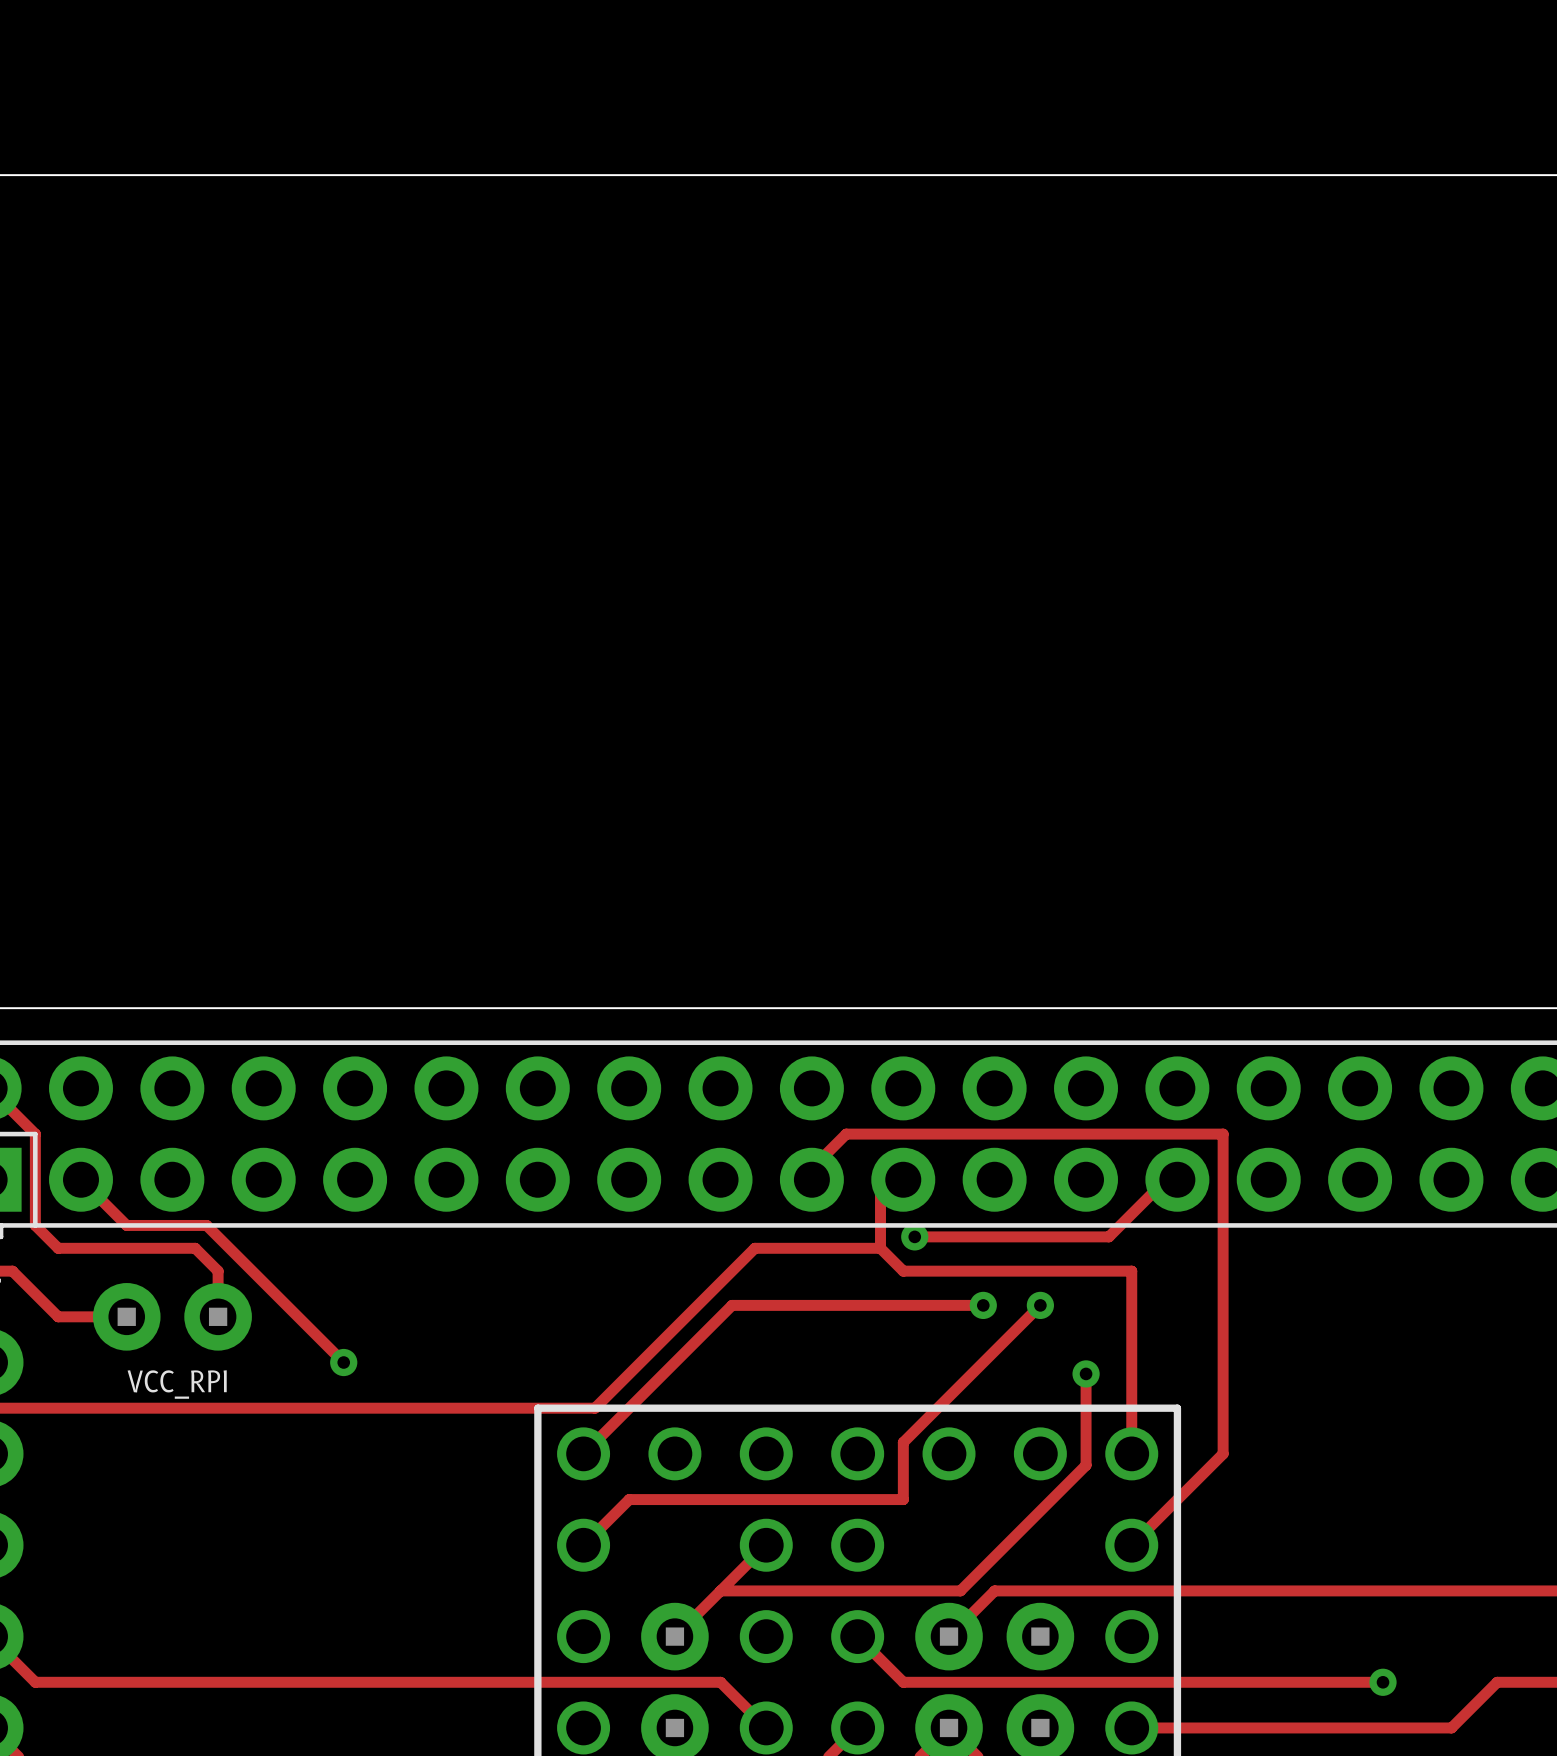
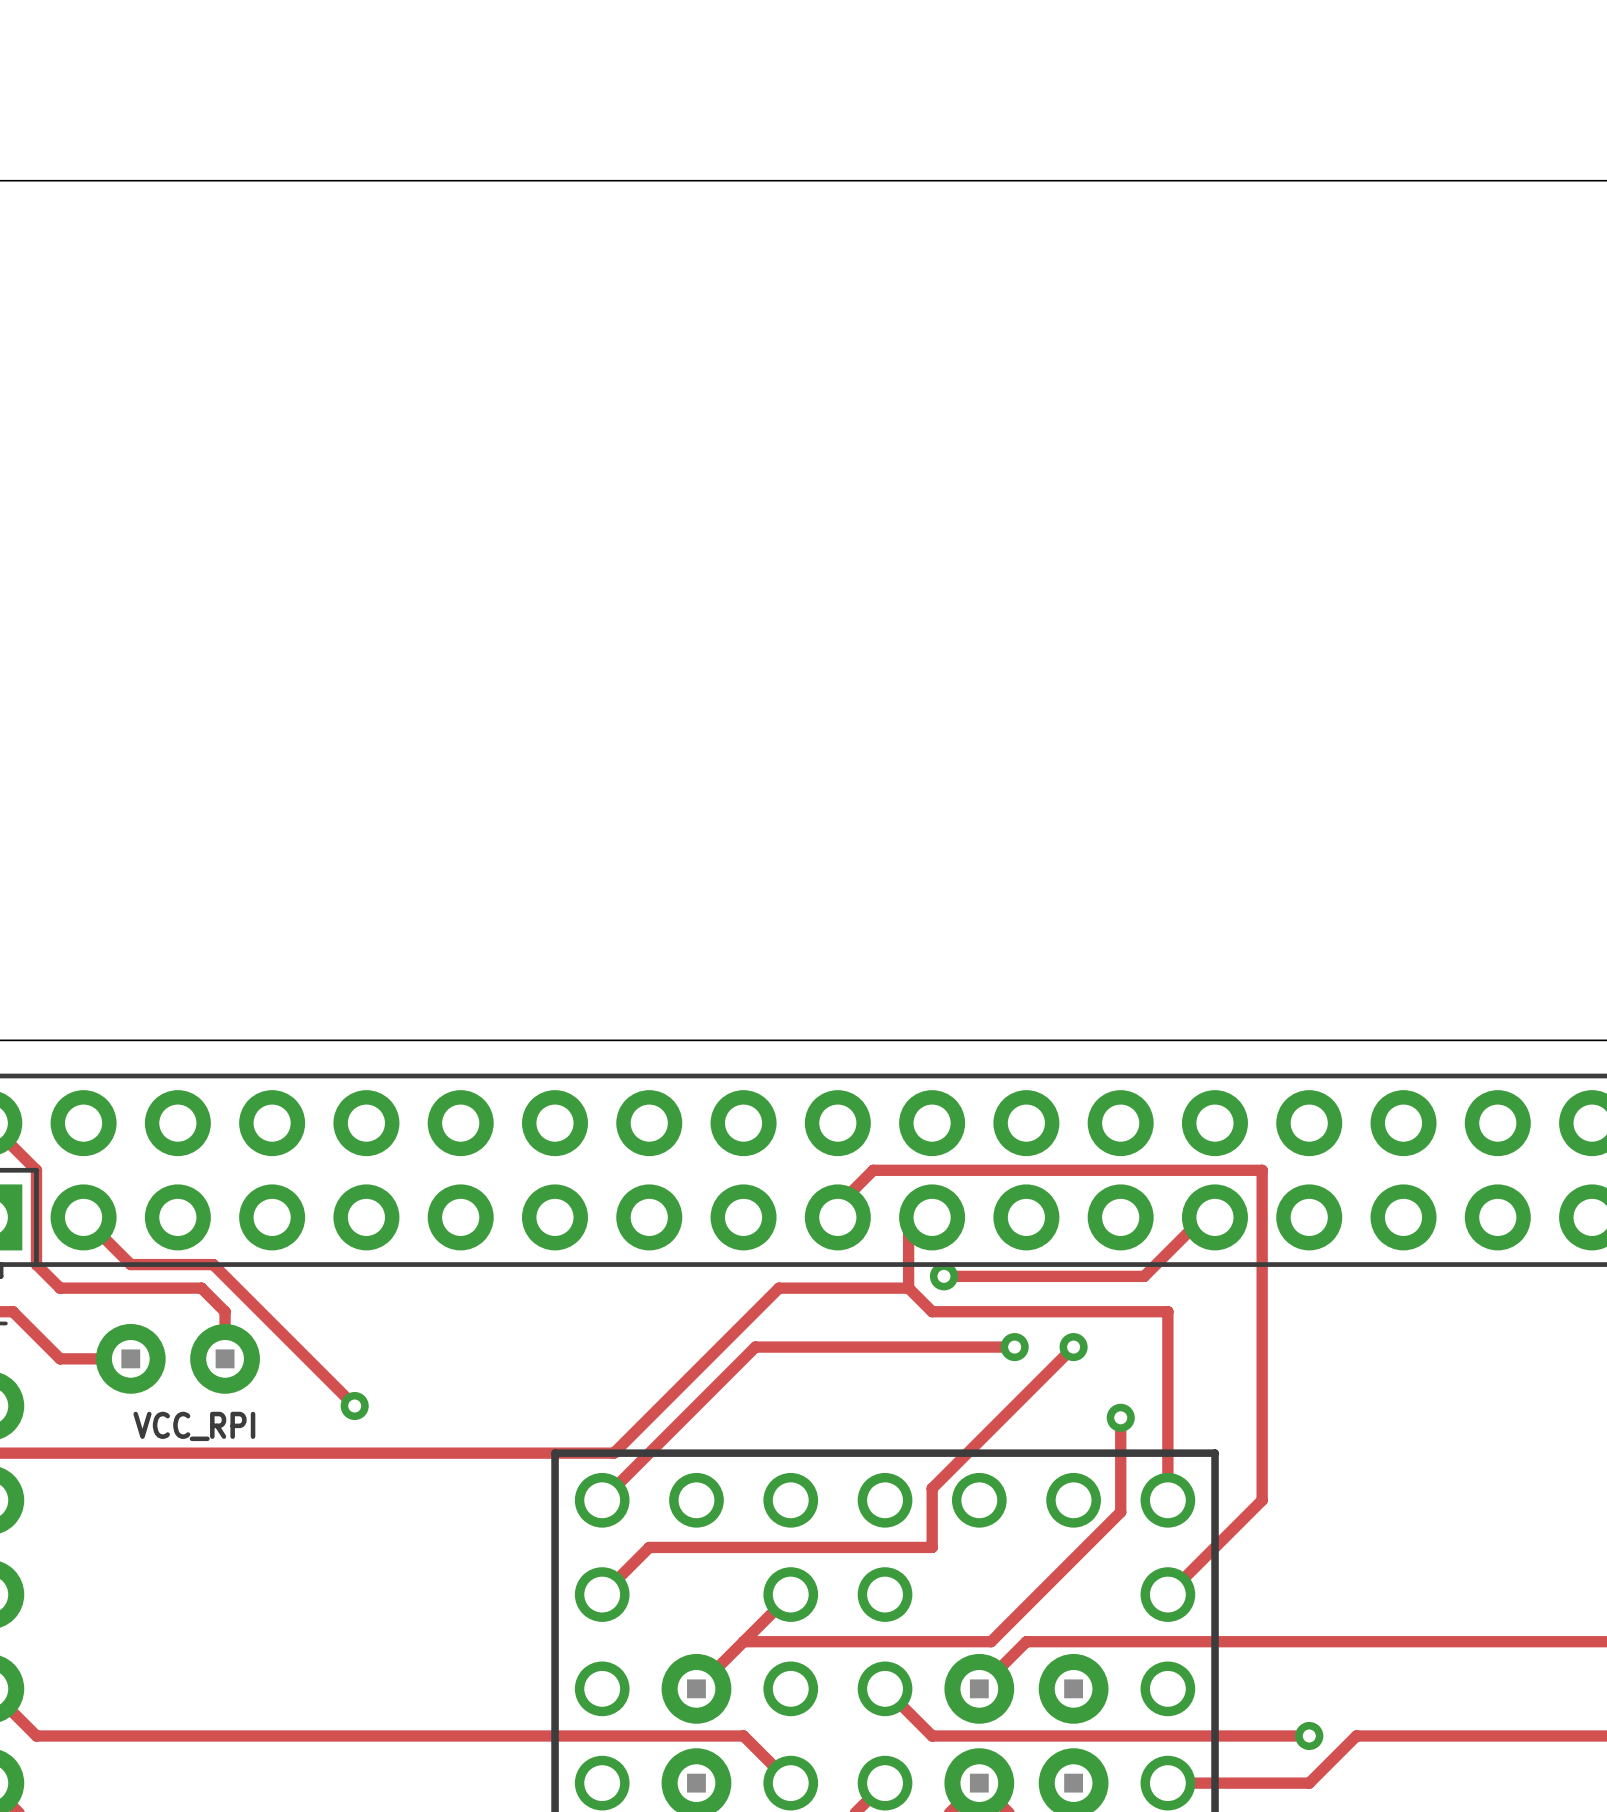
track: (1268, 1682) (1314, 1682) -> (1309, 1783) (1356, 1735)
via position: (1383, 1682) -> (1309, 1735)
track: (1497, 1682) (1451, 1727) (1268, 1727) -> (1545, 1735) (1427, 1735)

